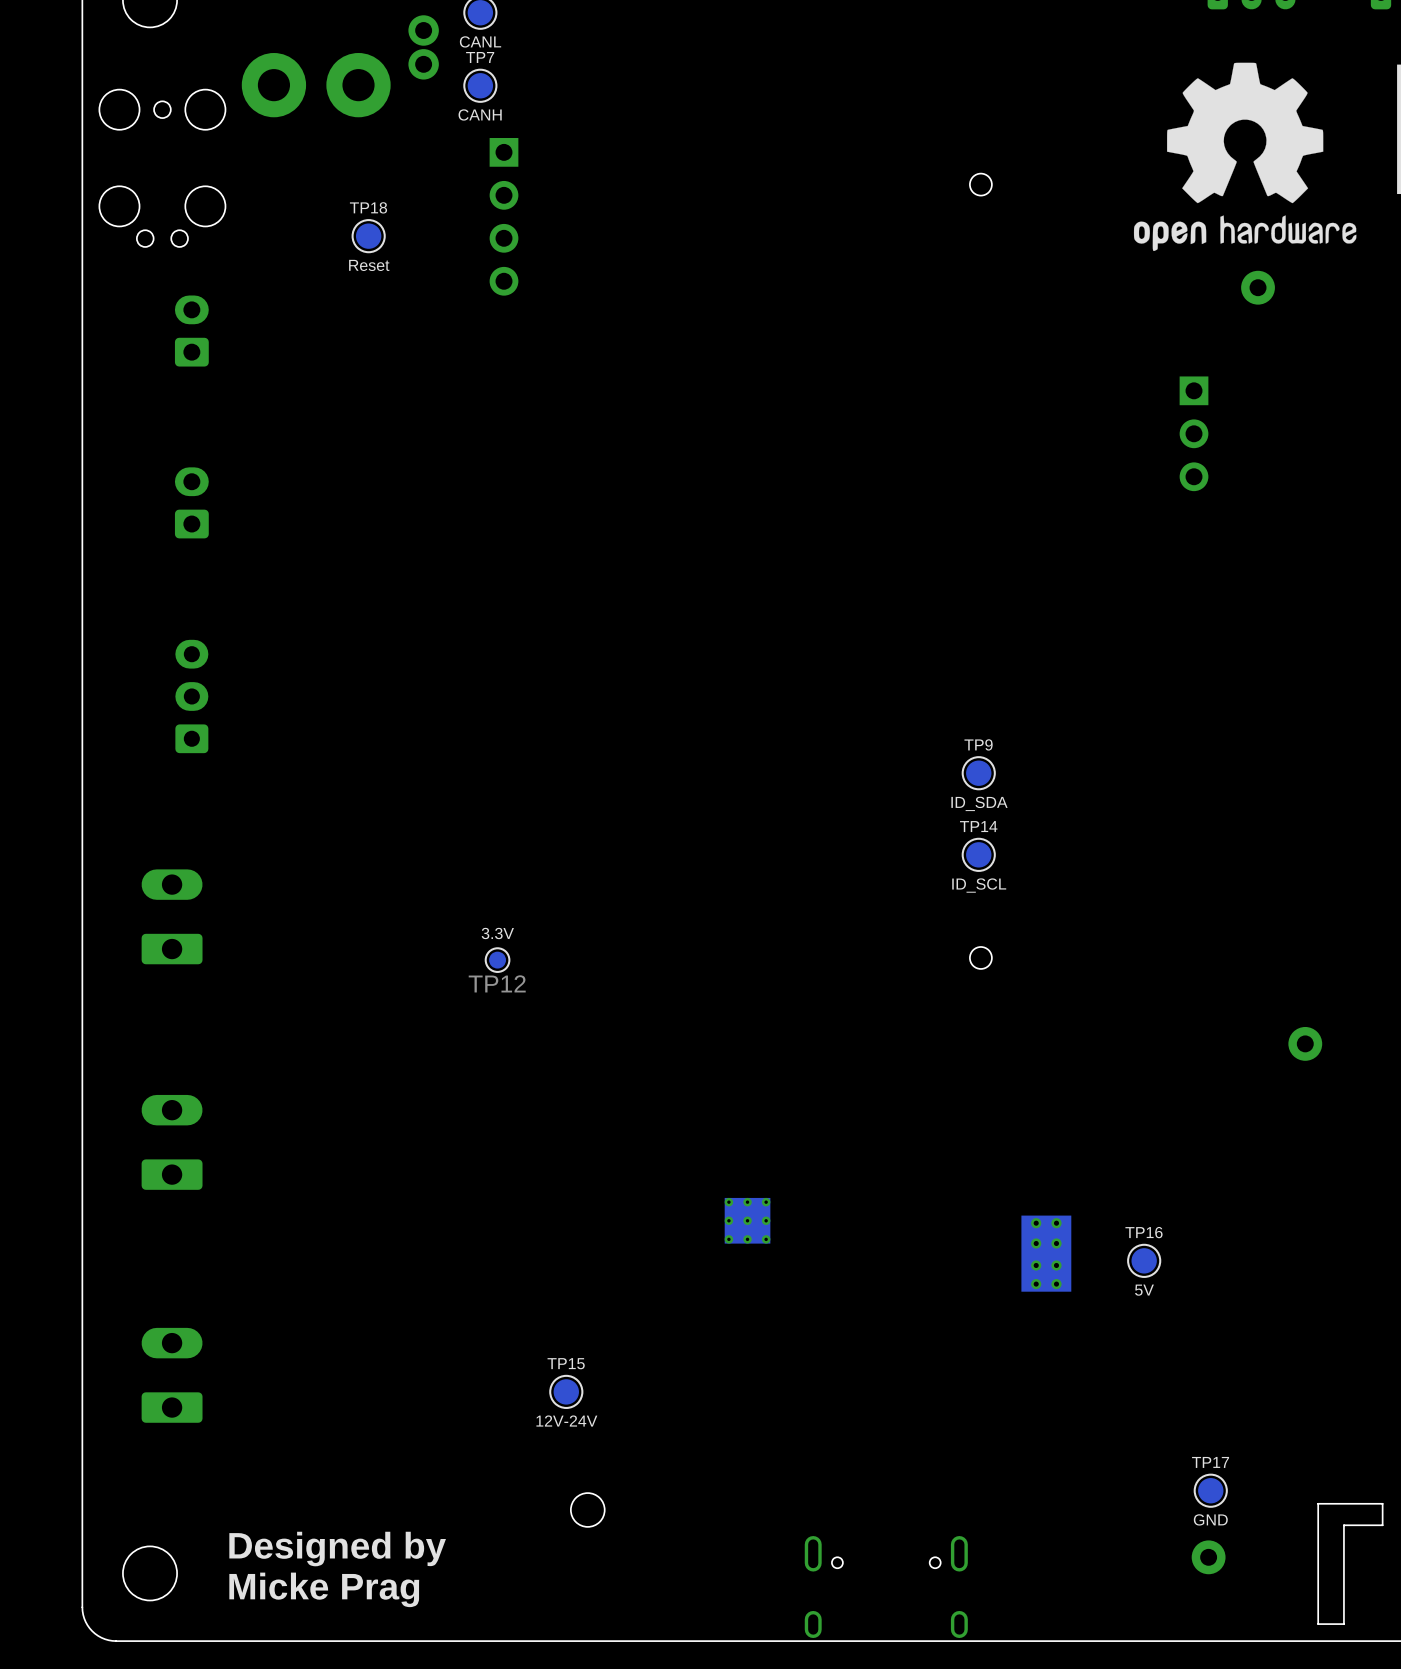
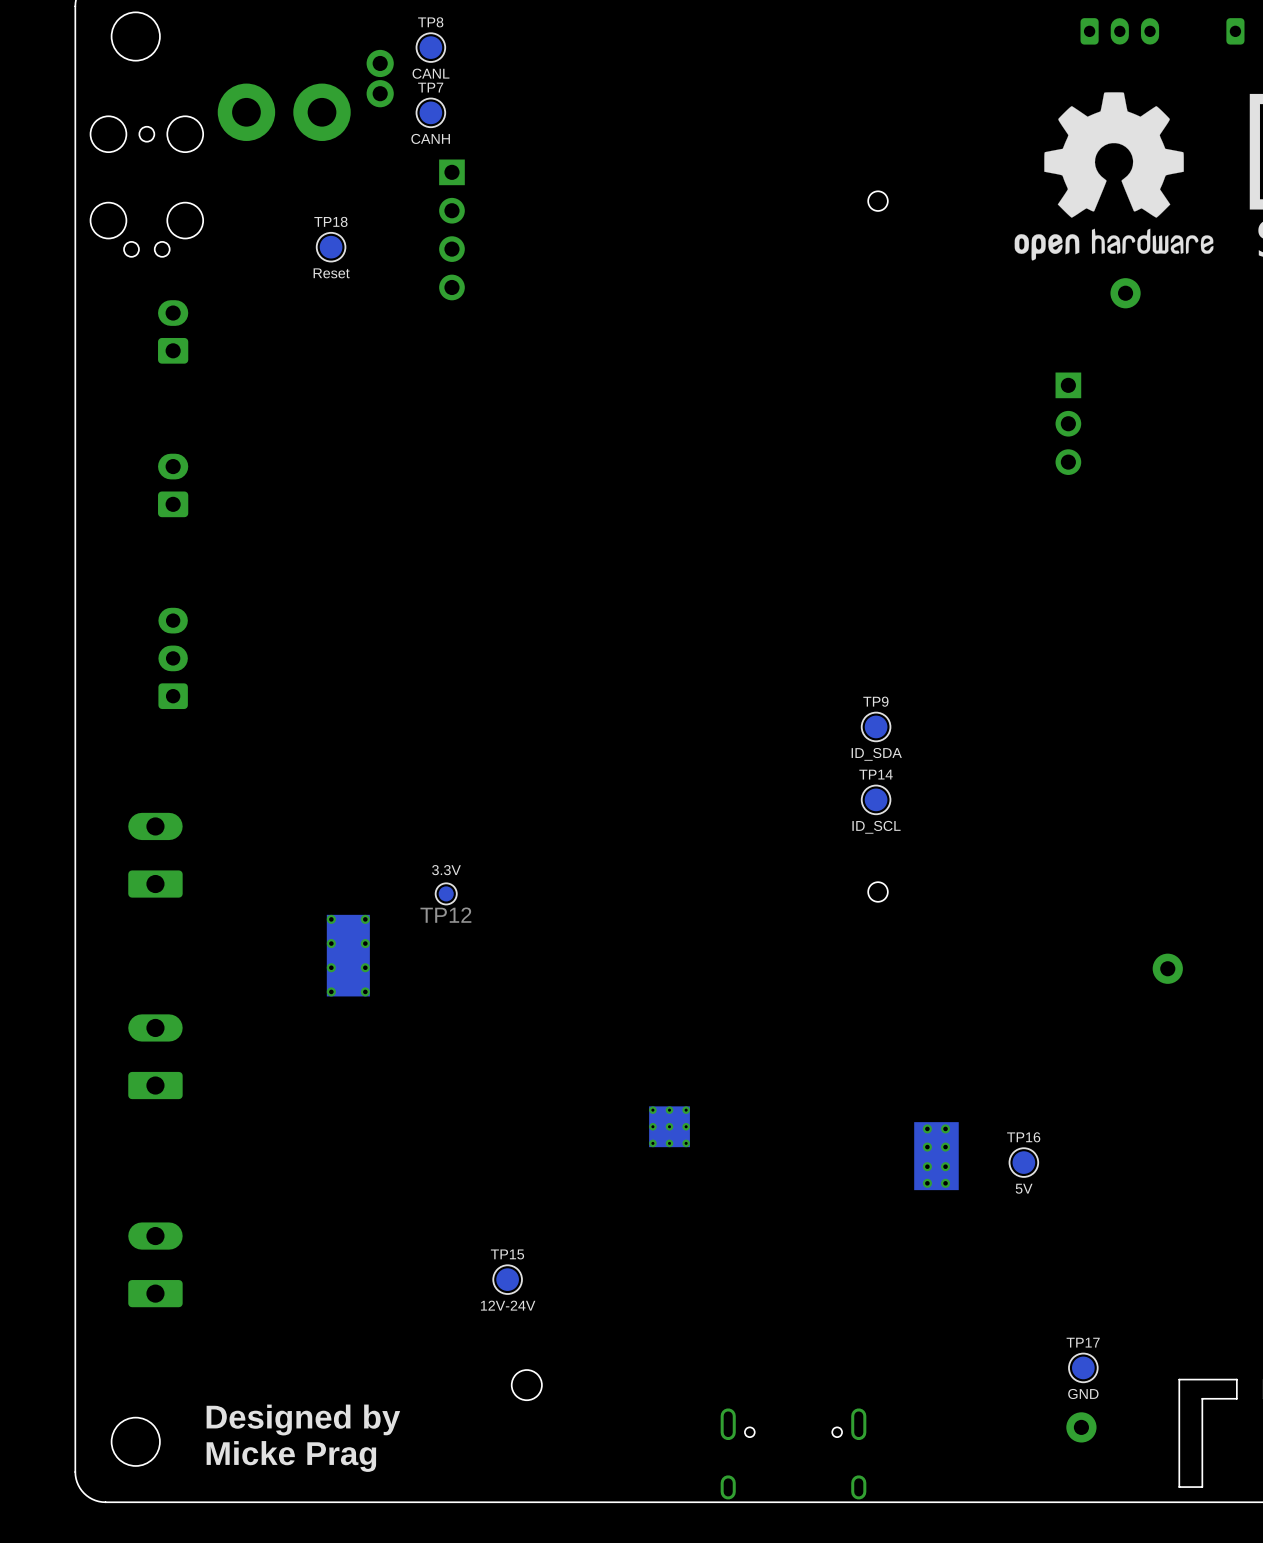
part: none -> (348, 955)

